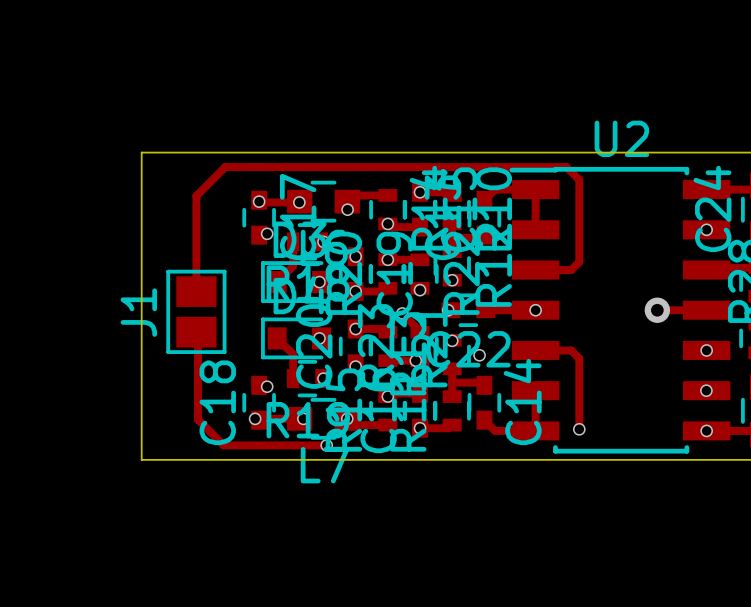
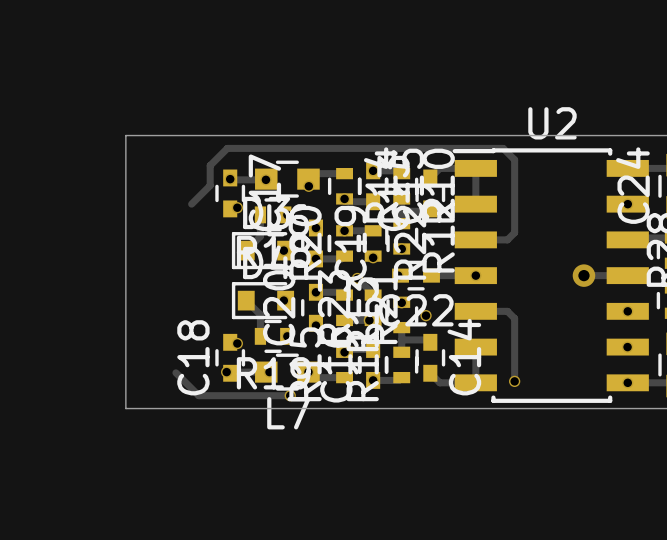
track: (255, 167) (225, 167) (196, 196) (196, 291) -> (227, 148) (210, 165) (210, 185) (191, 204)
J1: (196, 311) -> none
track: (196, 332) (198, 333) (198, 419) -> none

